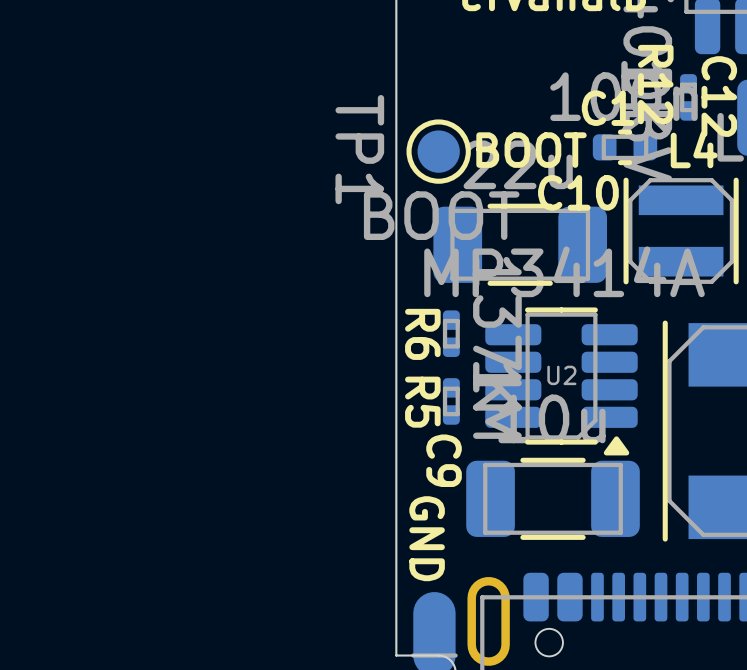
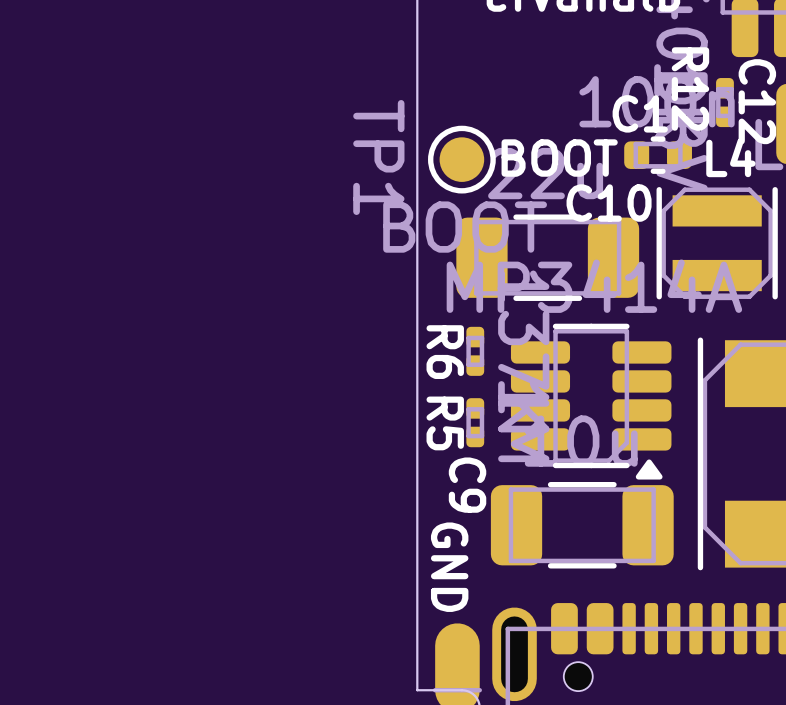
U2 name: U2 (561, 375) -> none

